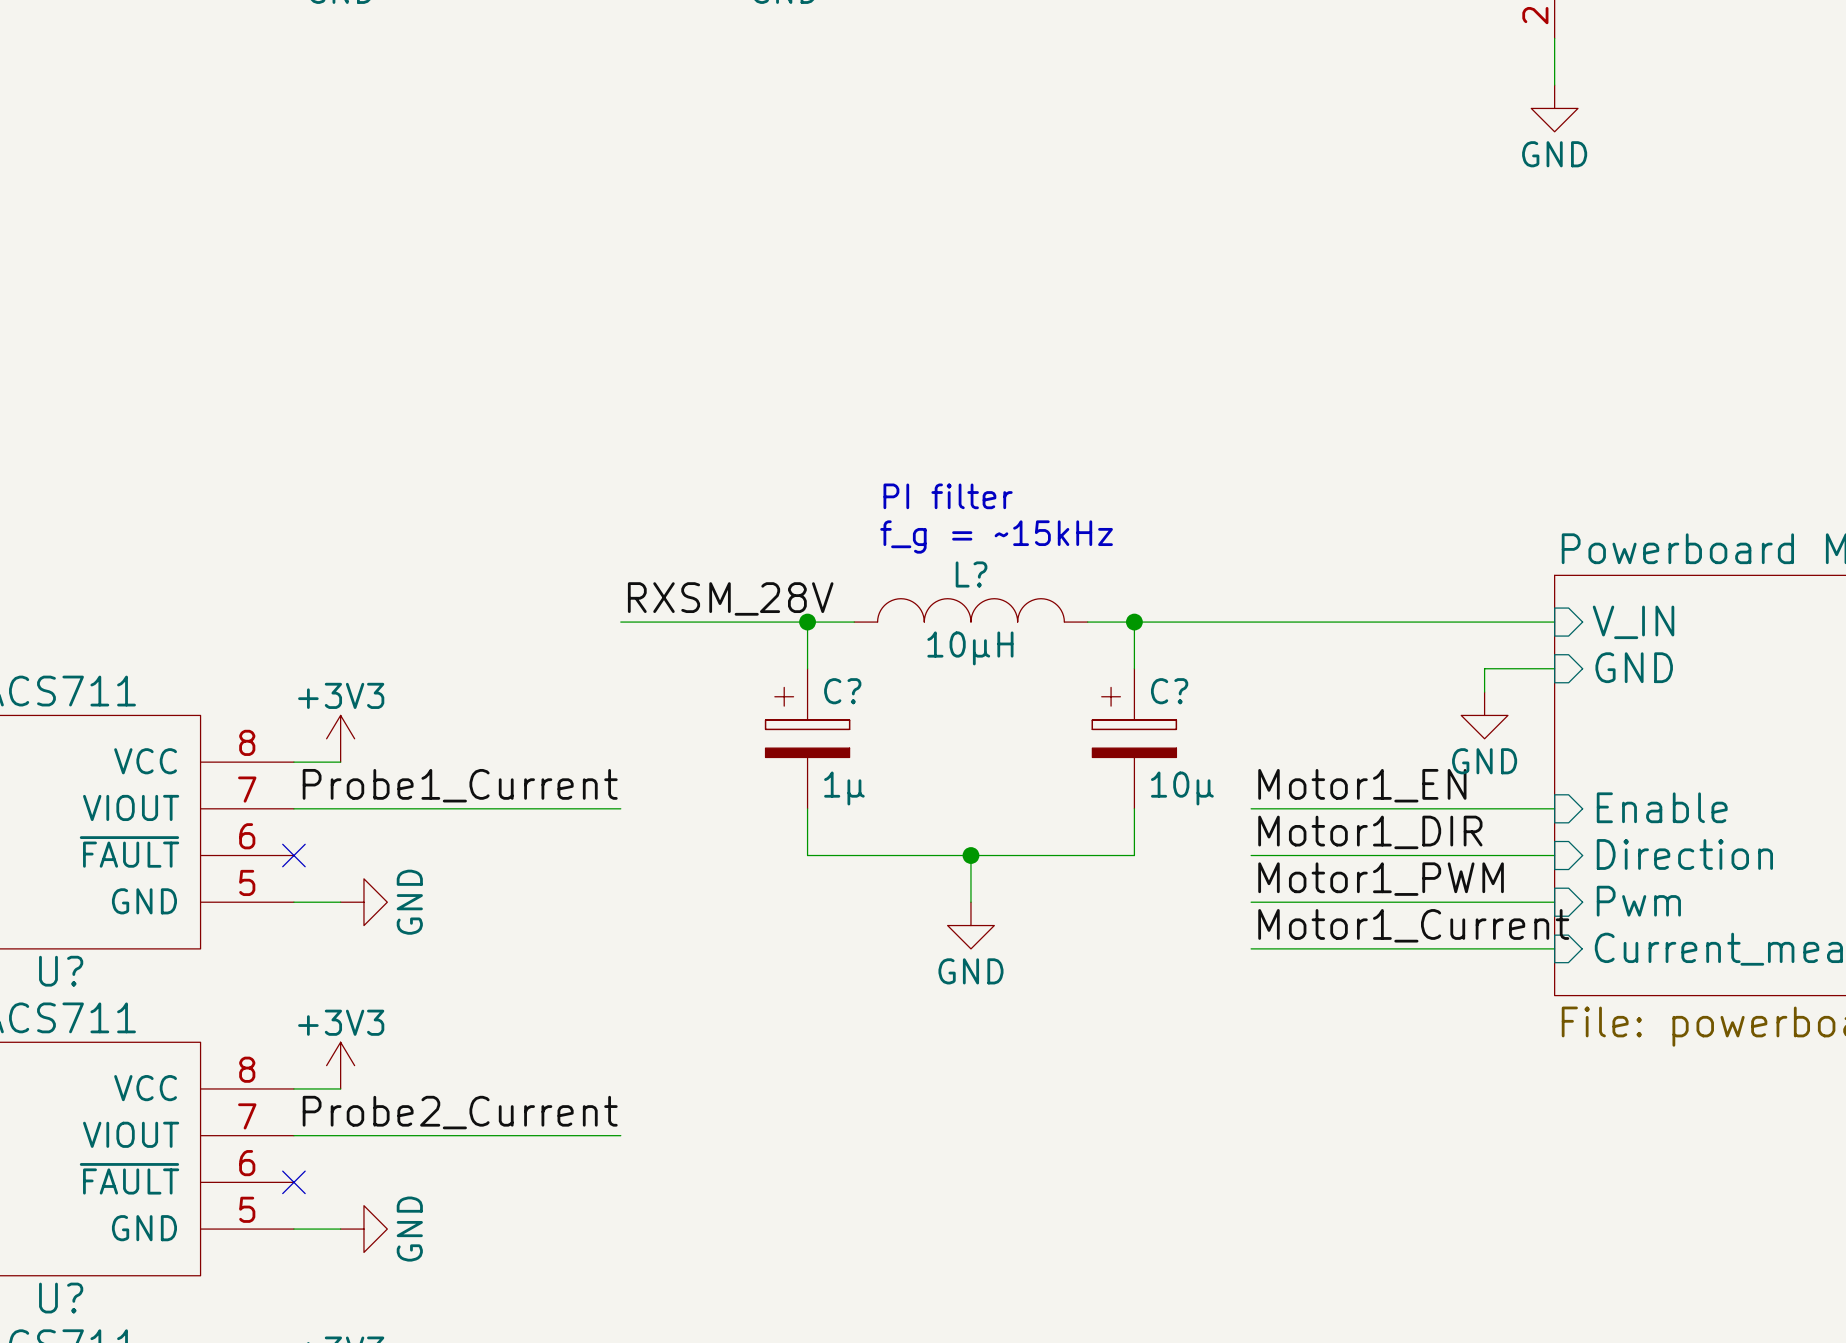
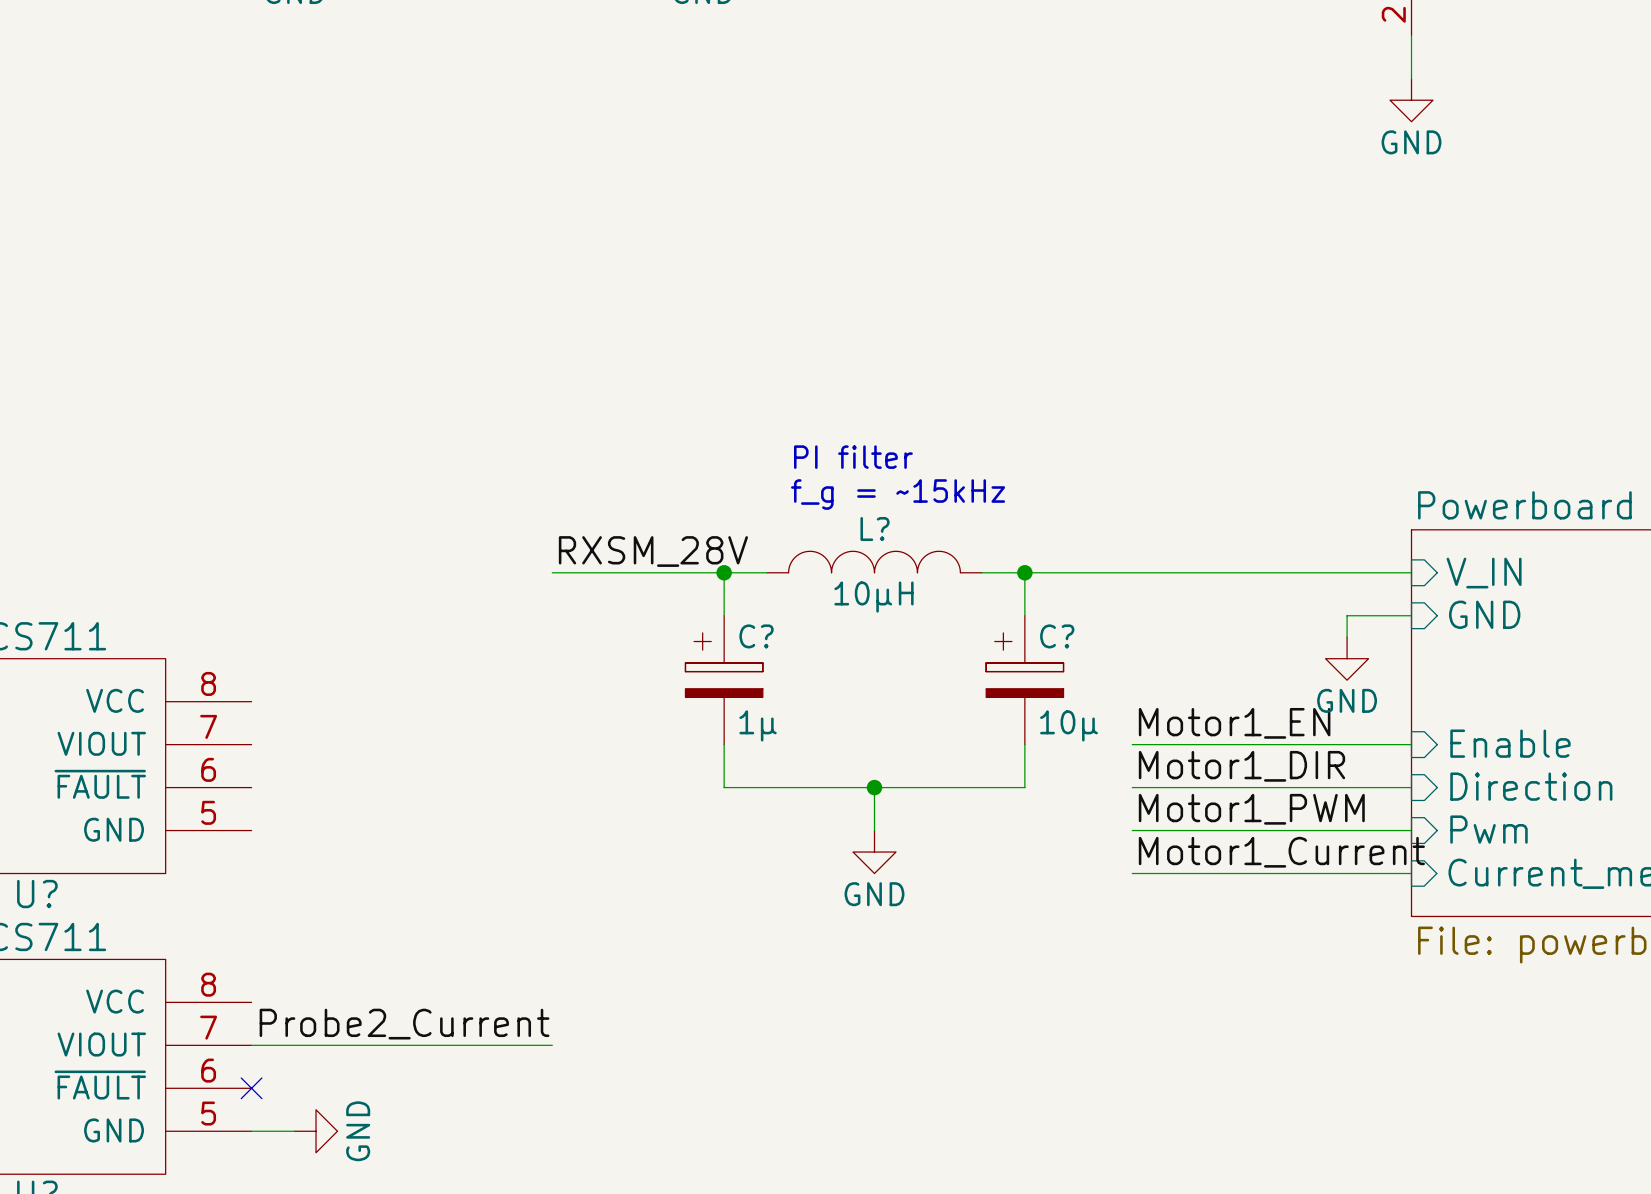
power symbol: +3V3 (340, 738) -> none
wire: (293, 762) (340, 762) -> none
label: Probe1_Current (460, 785) -> none
wire: (293, 808) (620, 808) -> none
no-connect mark: (293, 855) -> none
wire: (293, 902) (340, 902) -> none
power symbol: GND (363, 902) -> none
power symbol: +3V3 (340, 1065) -> none
wire: (293, 1088) (340, 1088) -> none

